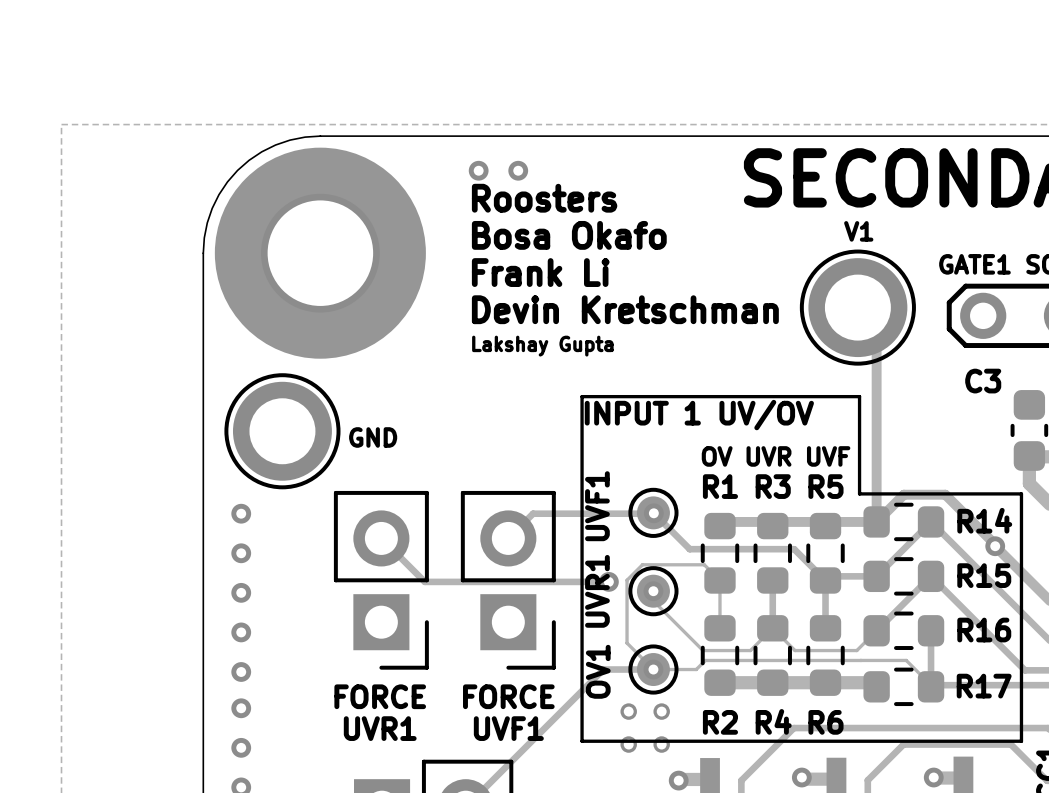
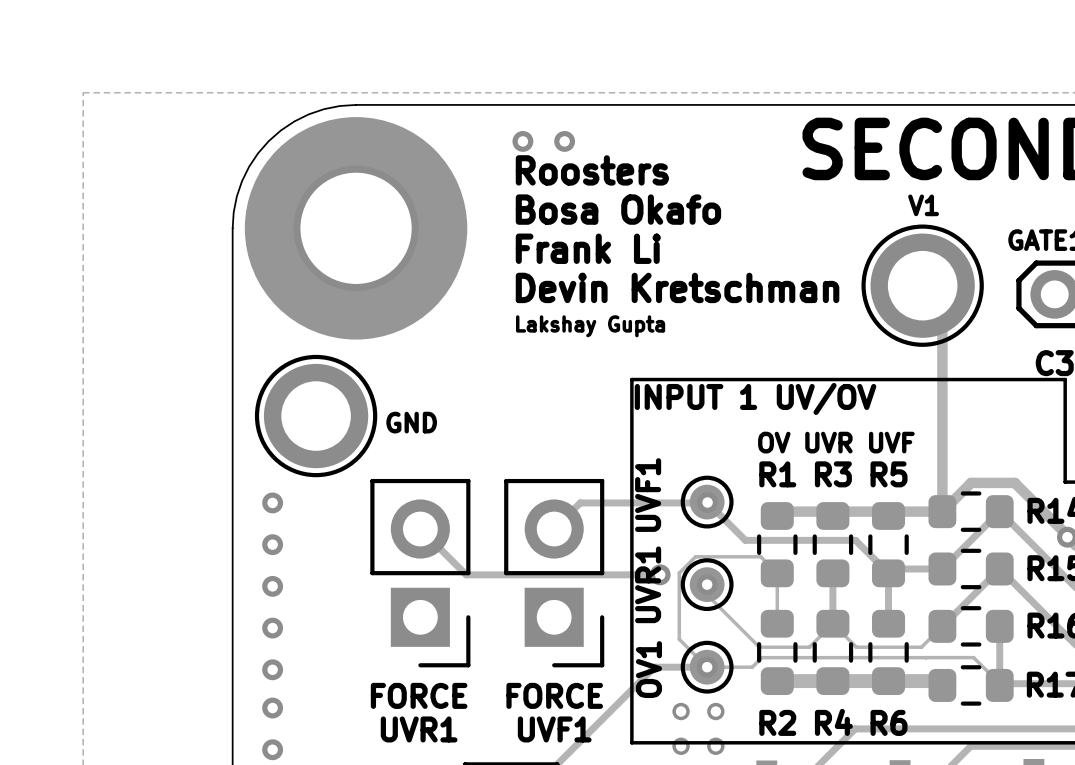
line: (859, 396) (859, 493) (993, 493) -> (924, 379) (1065, 379) (1065, 482)

